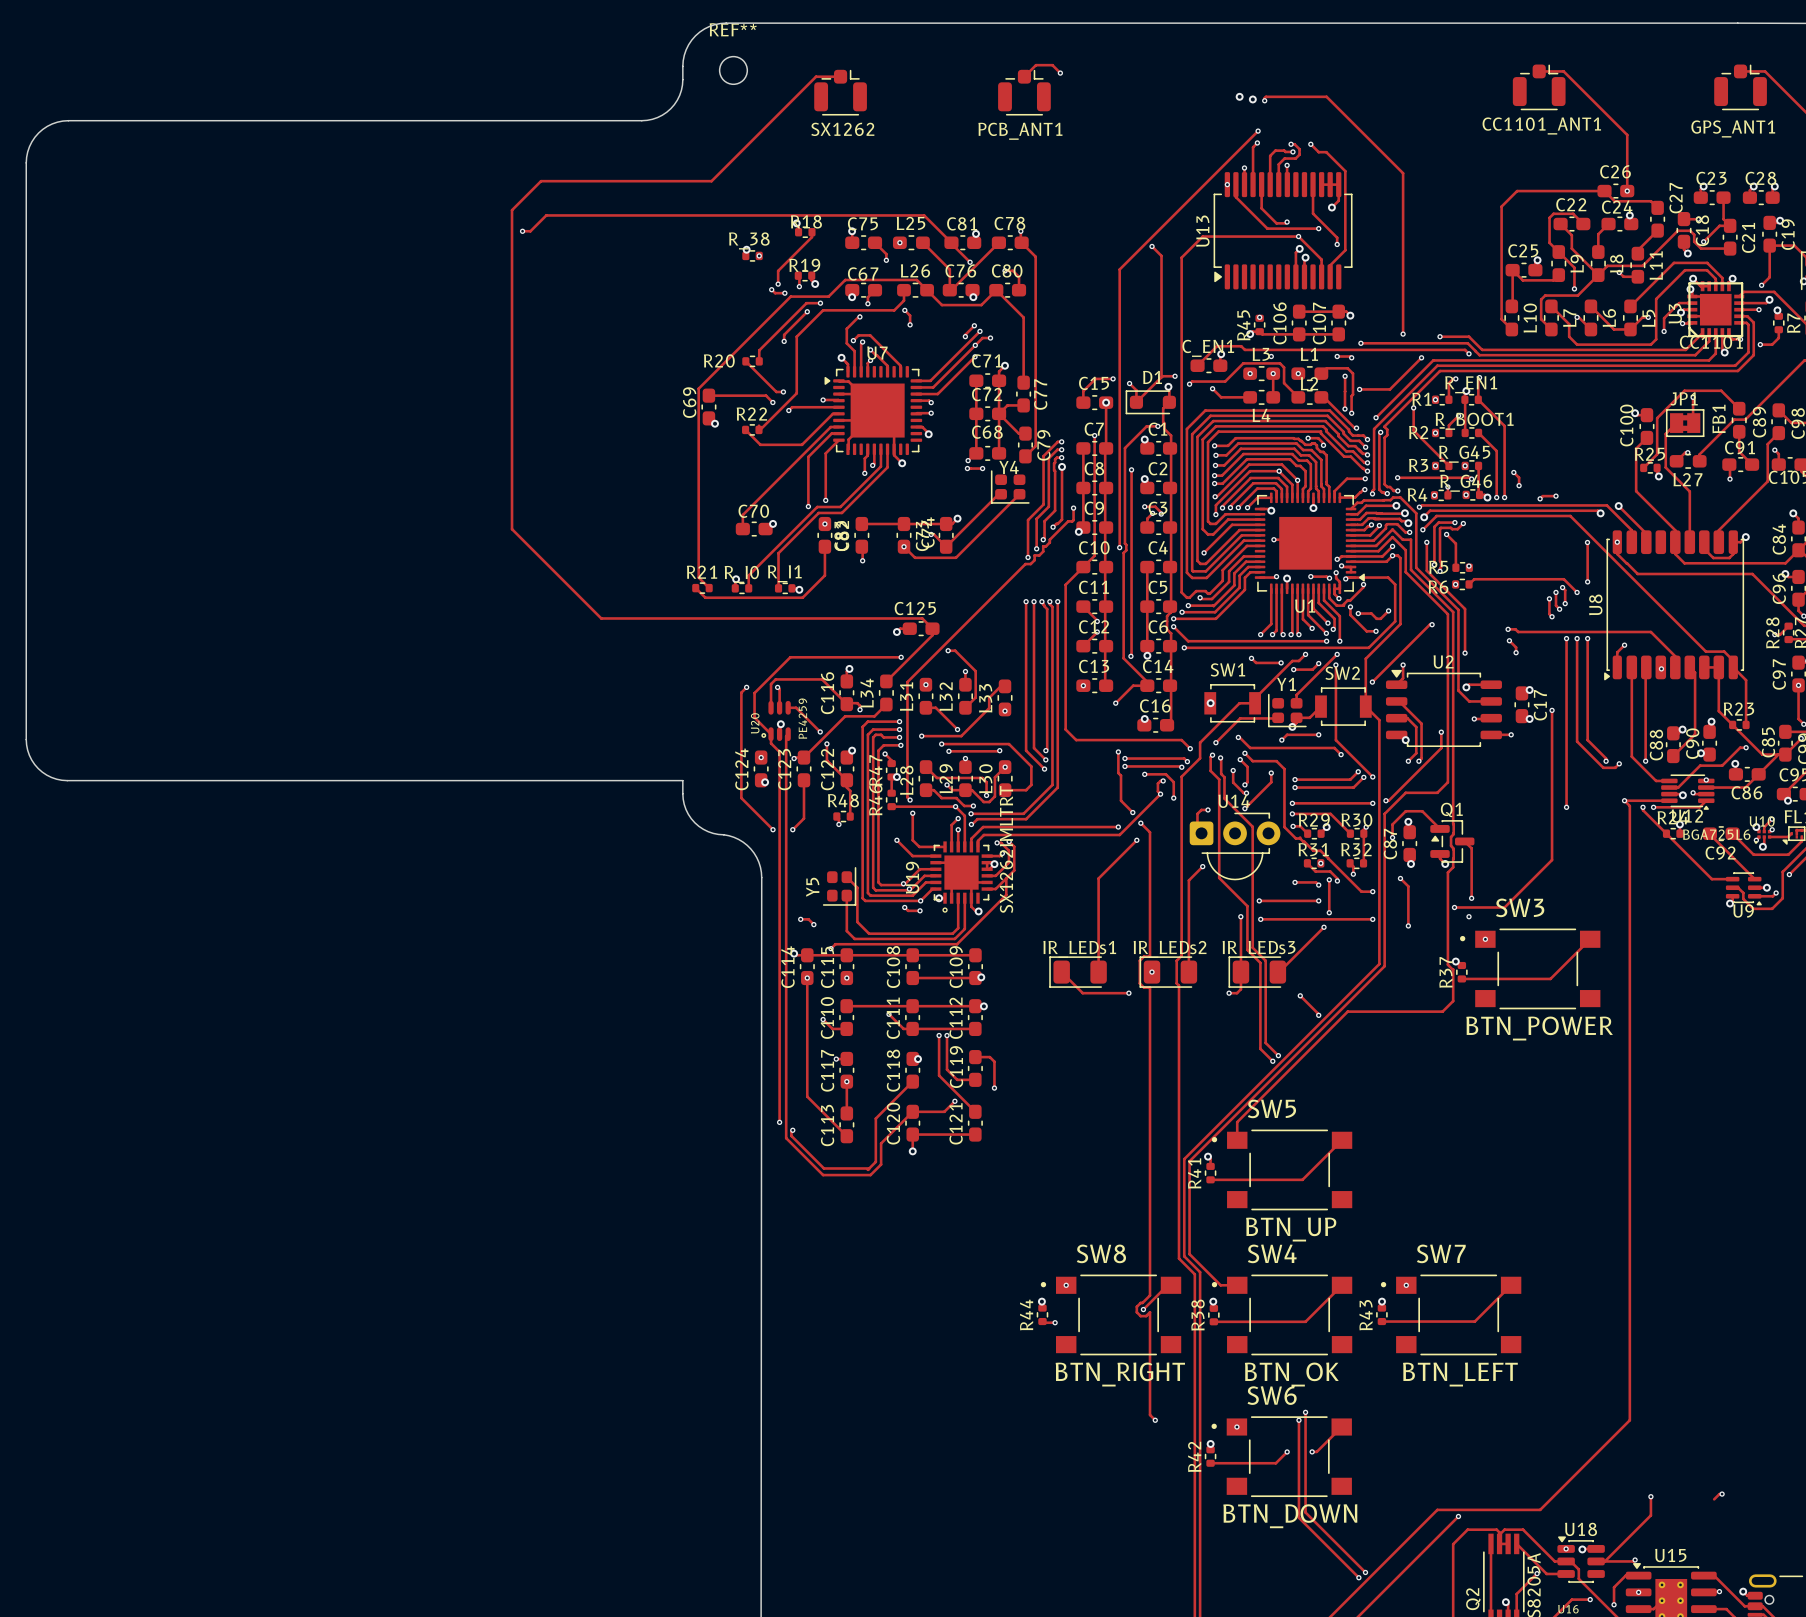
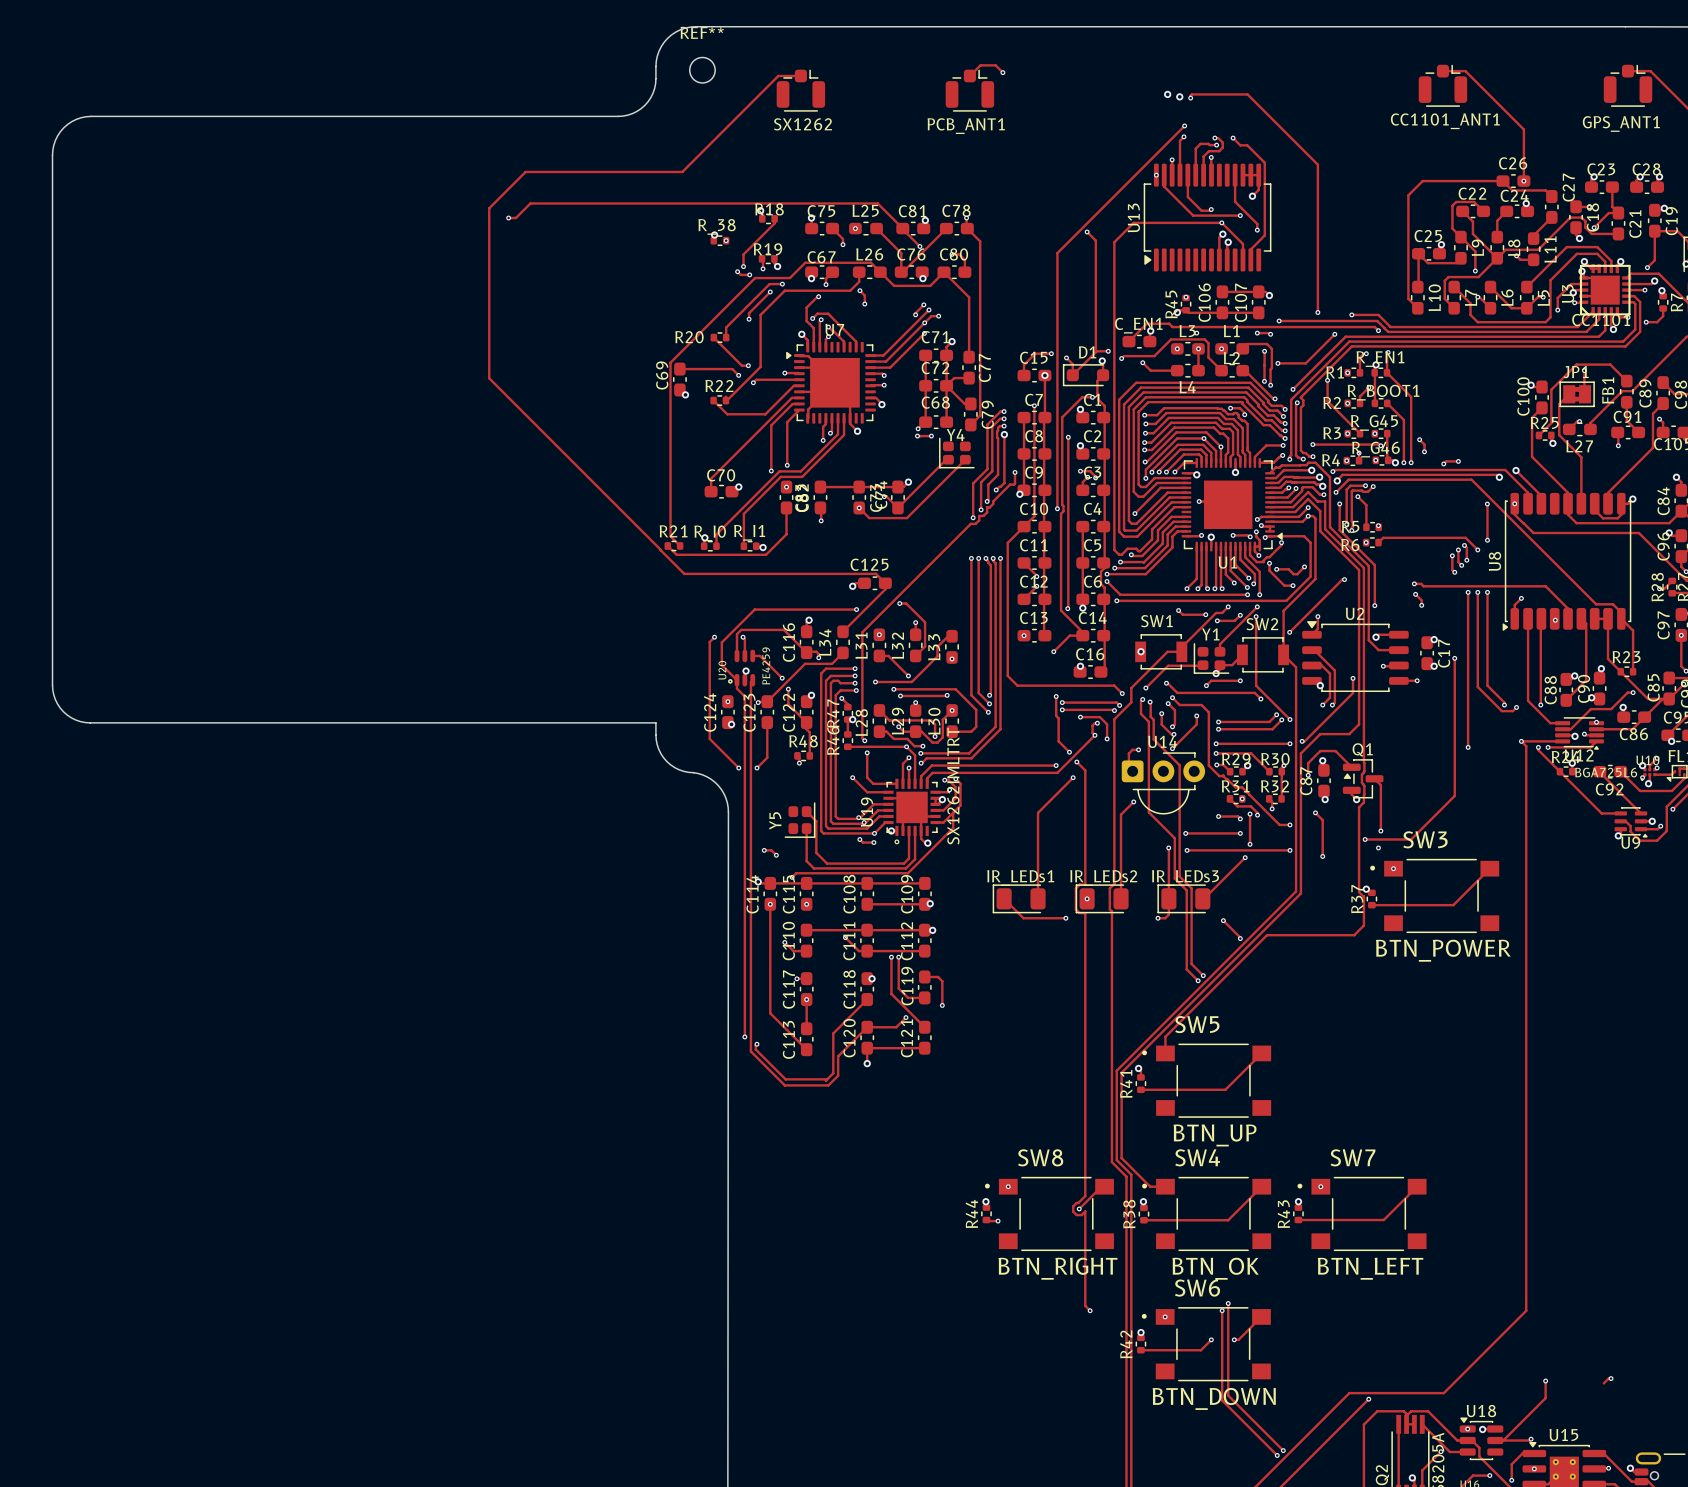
track: (512, 210) (512, 529) (601, 618) (713, 618) -> (498, 198) (489, 208) (489, 378) (684, 573)

